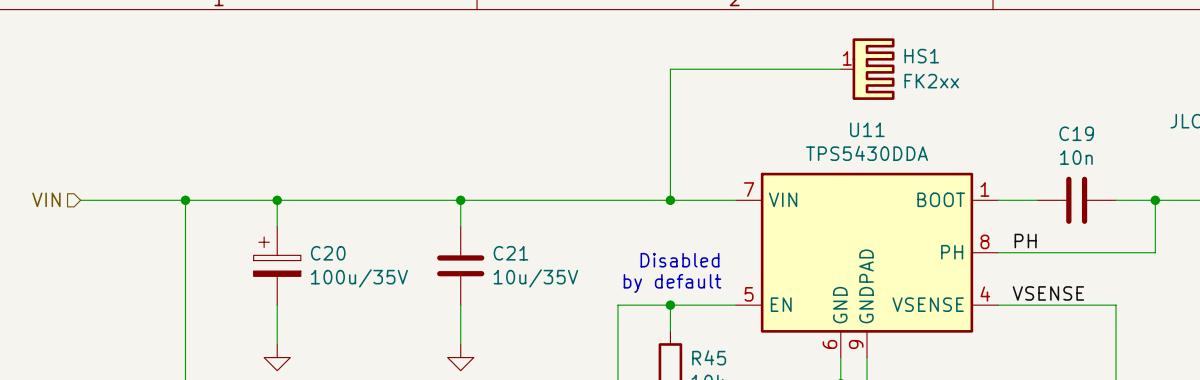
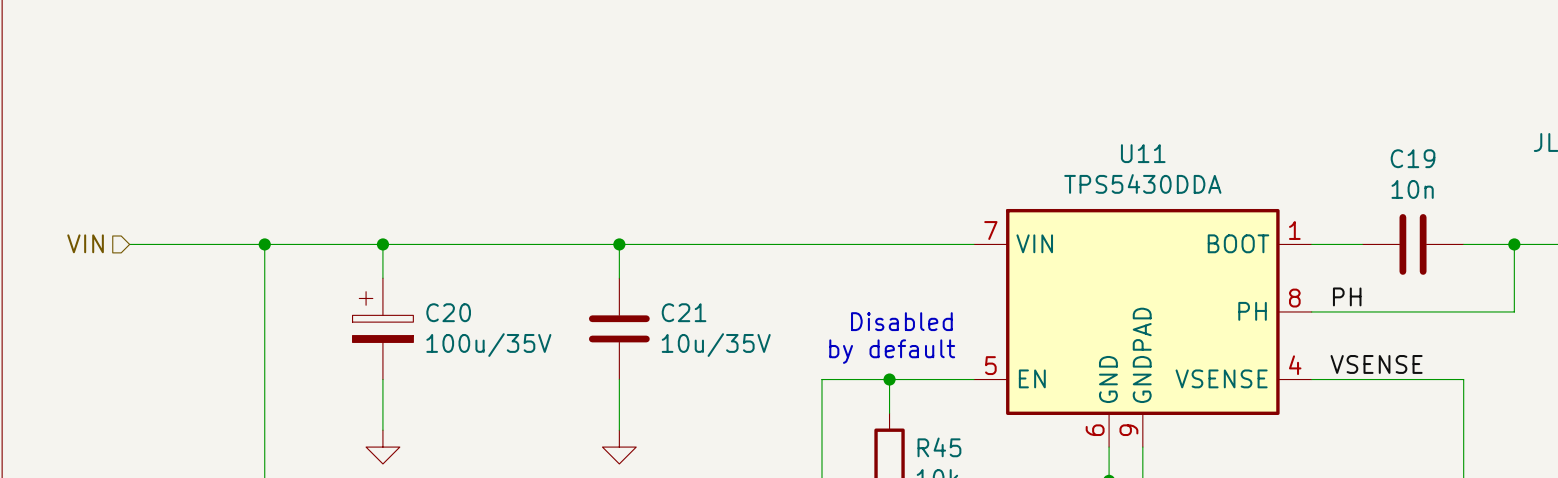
wire: (840, 69) (670, 69) (670, 200) -> none
HS1: FK2xx (867, 69) -> none
junction: (670, 200) -> none

